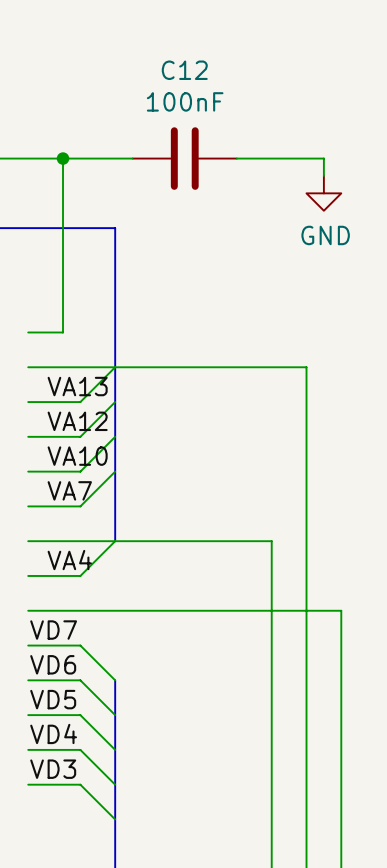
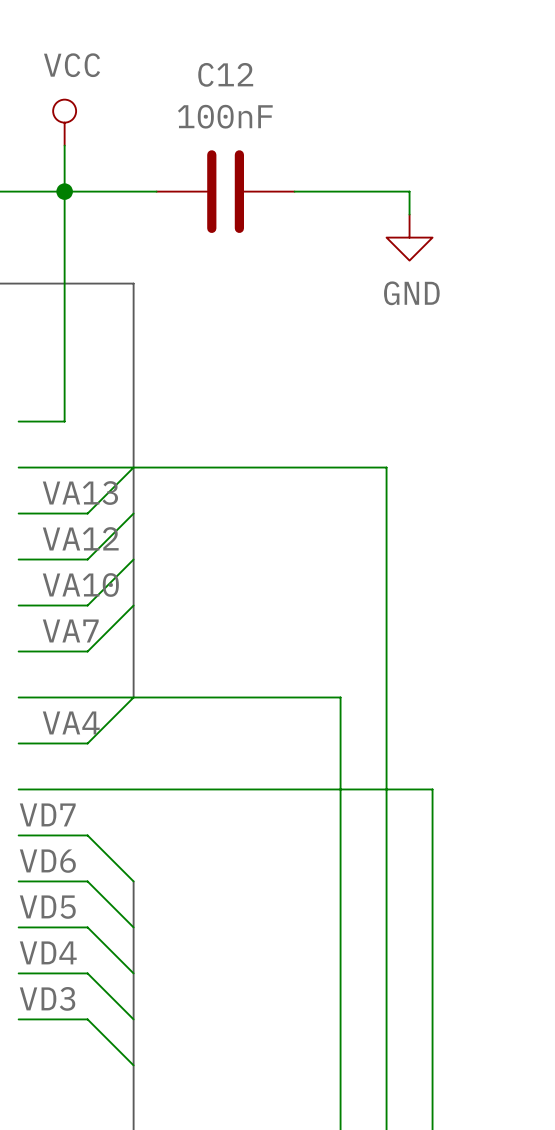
power symbol: none -> VCC (64, 122)
wire: none -> (64, 145) (64, 191)

